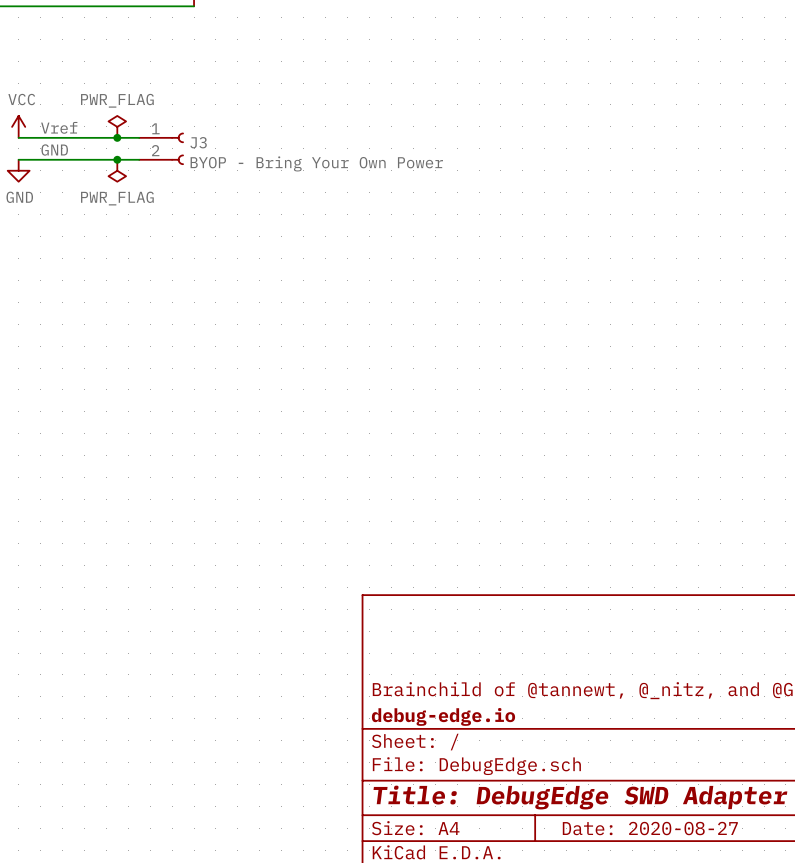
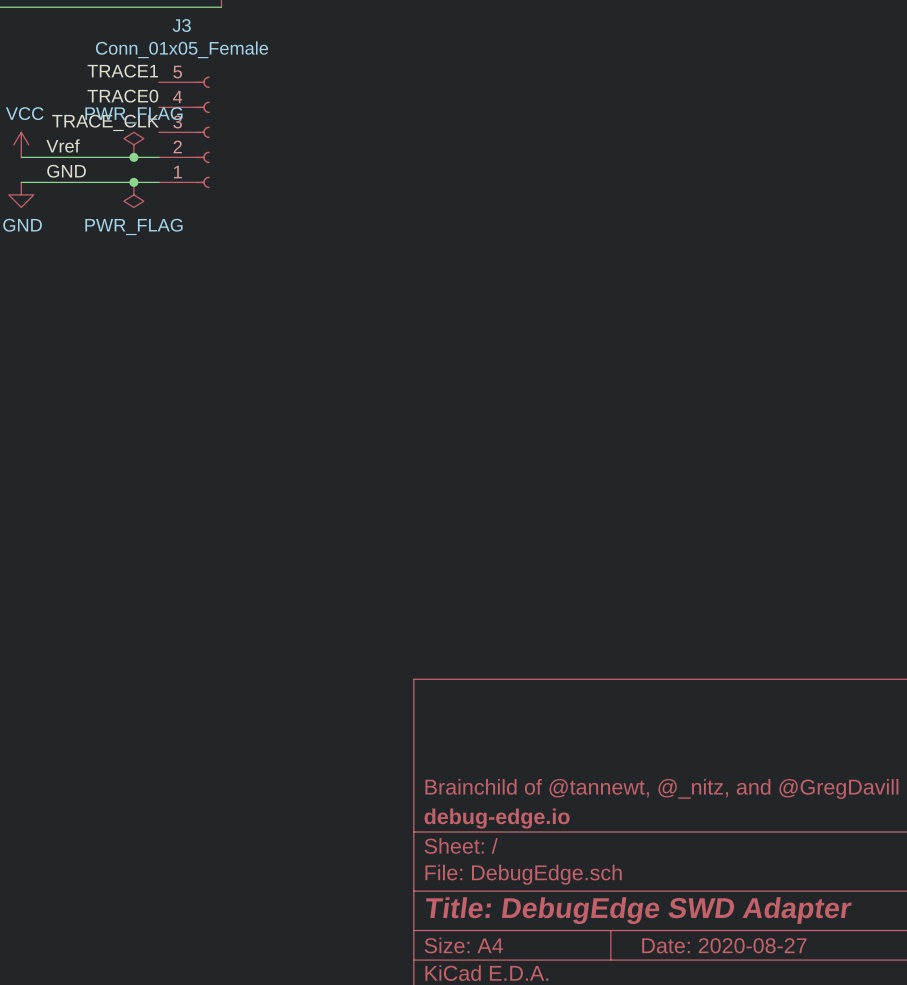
label: none -> TRACE1 (122, 71)
label: none -> TRACE0 (122, 96)
label: none -> TRACE_CLK (105, 122)
J3 symbol: [139, 132, 184, 165] -> [158, 76, 210, 189]
J3 name position: J3 (198, 142) -> J3 (181, 25)
J3 value: BYOP - Bring Your Own Power (316, 163) -> Conn_01x05_Female (182, 49)

